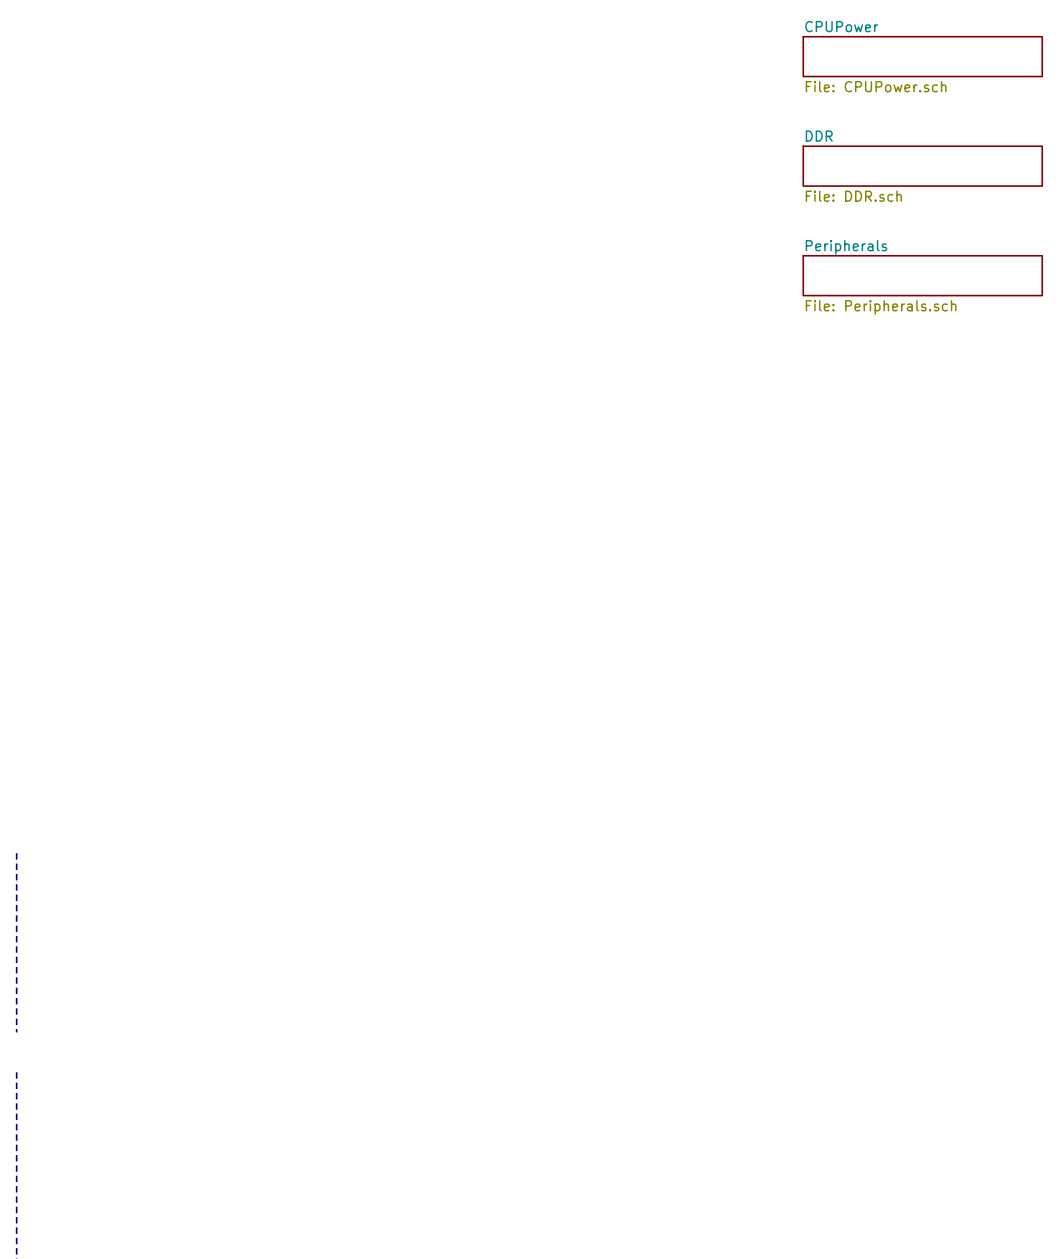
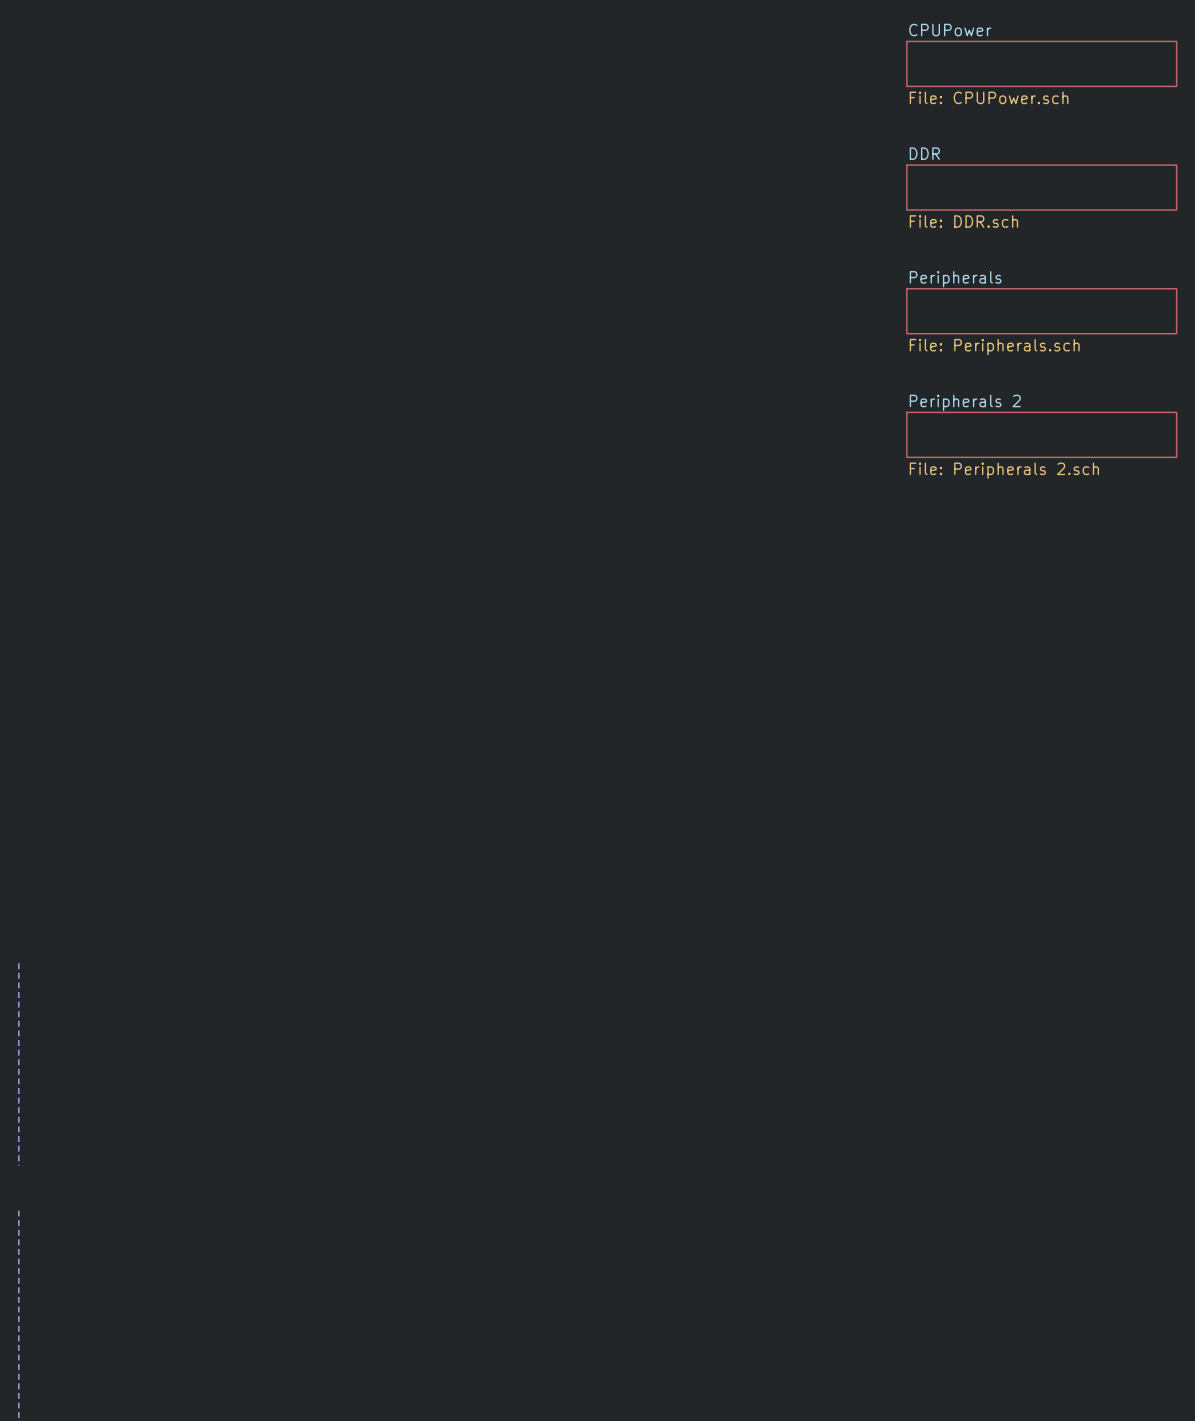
sheet Peripherals 2: none -> File: Peripherals 2.sch (1041, 434)

